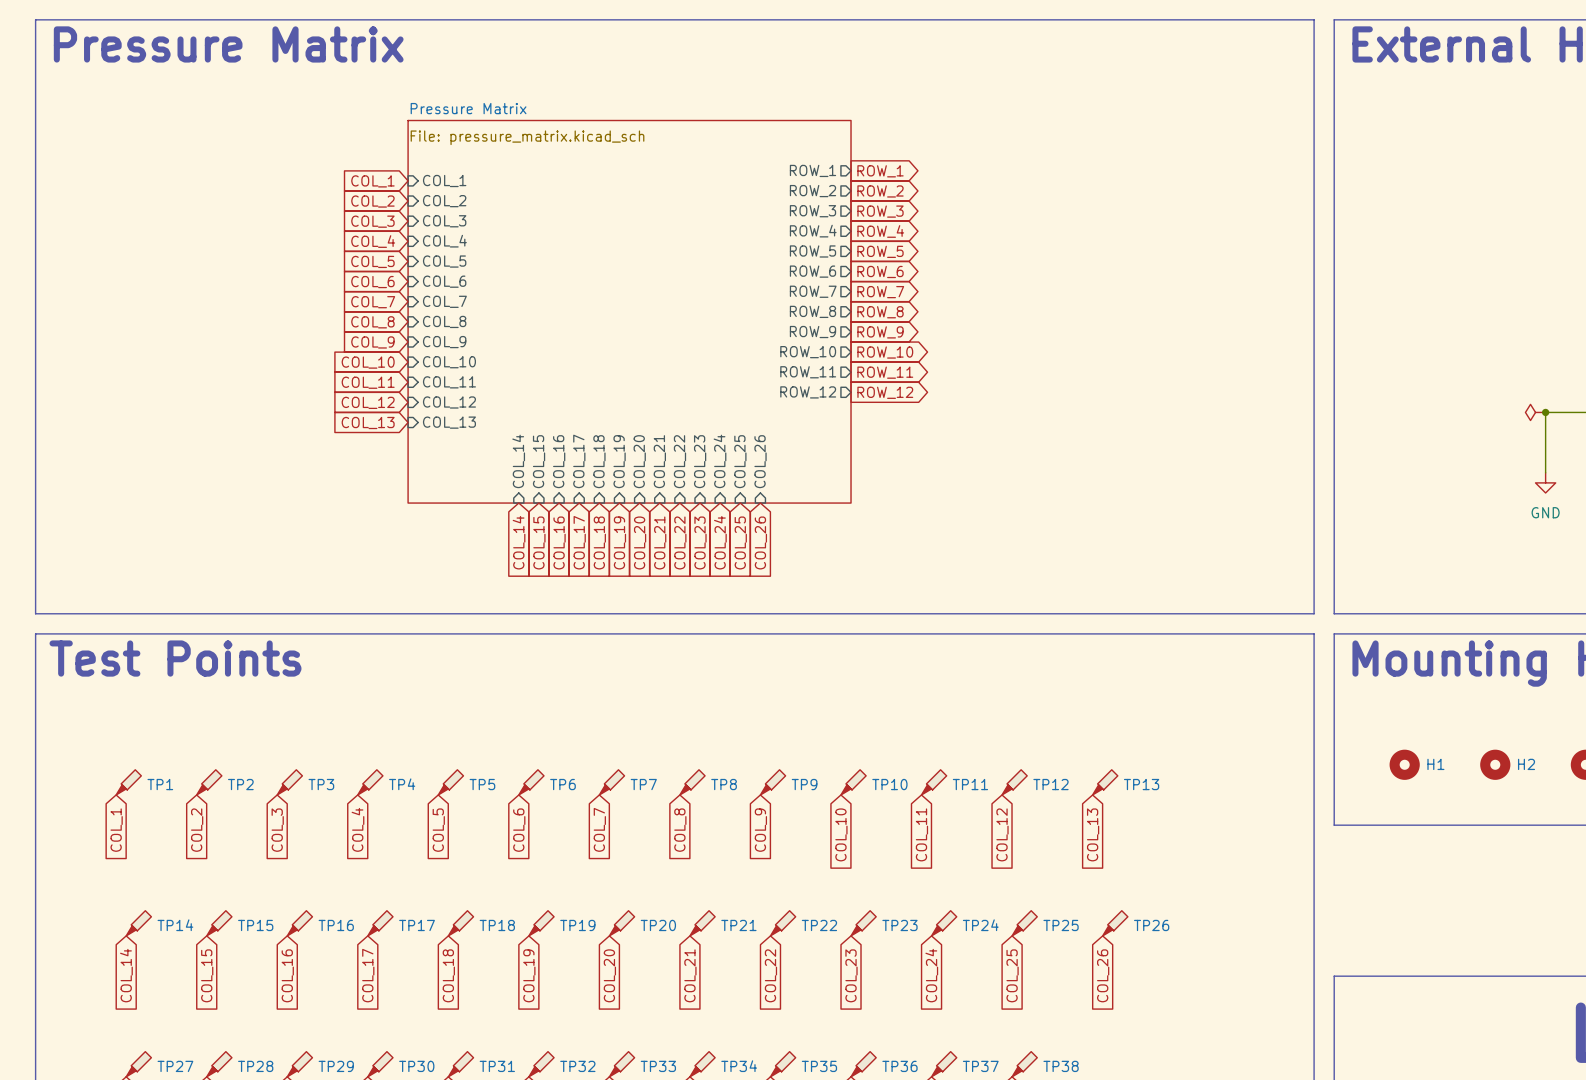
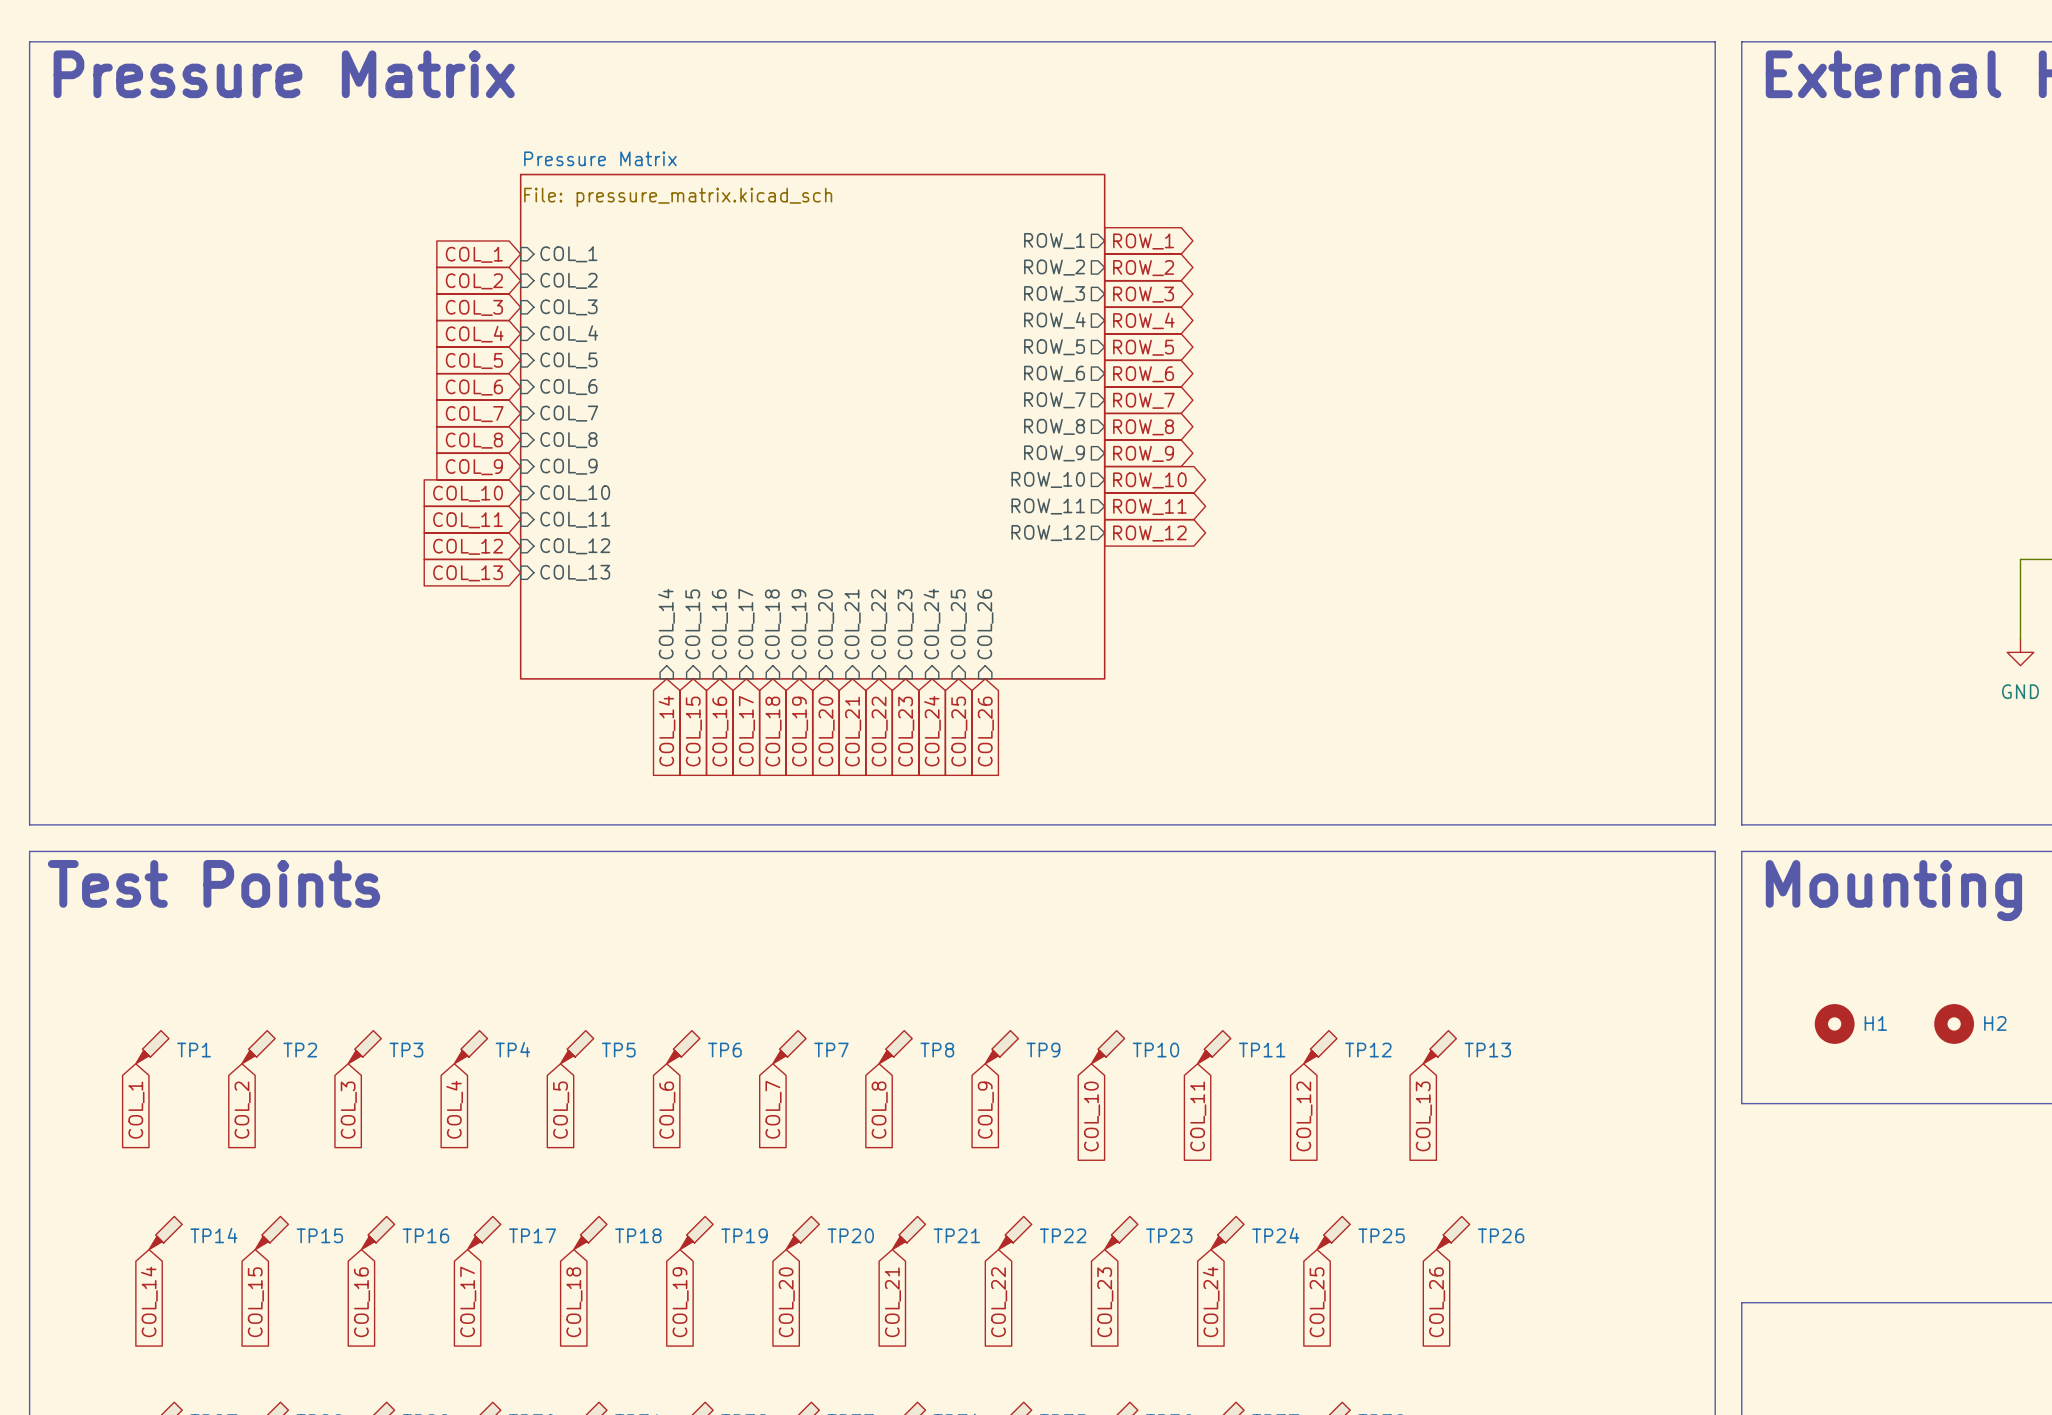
power symbol: (1535, 412) -> none
junction: (1545, 412) -> none

